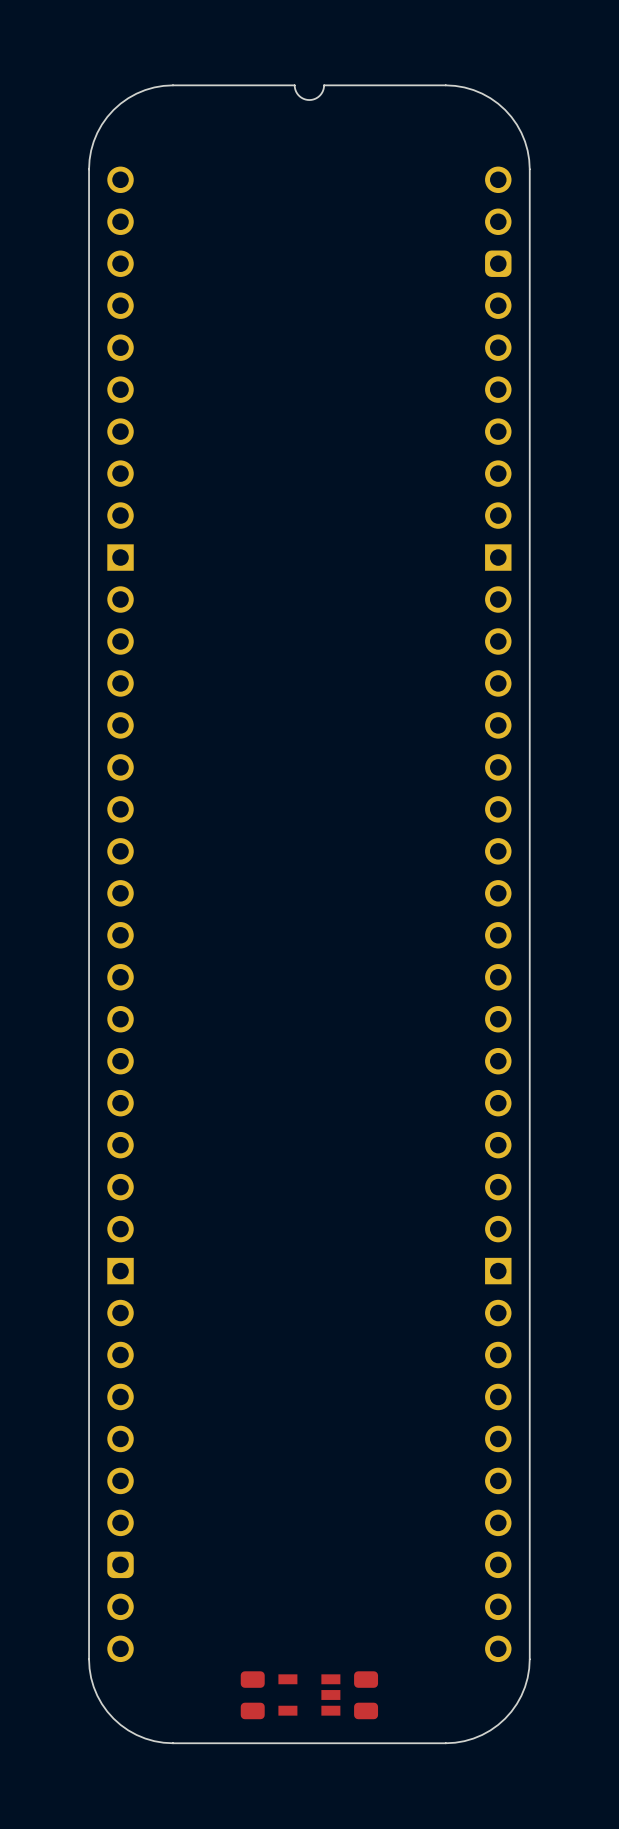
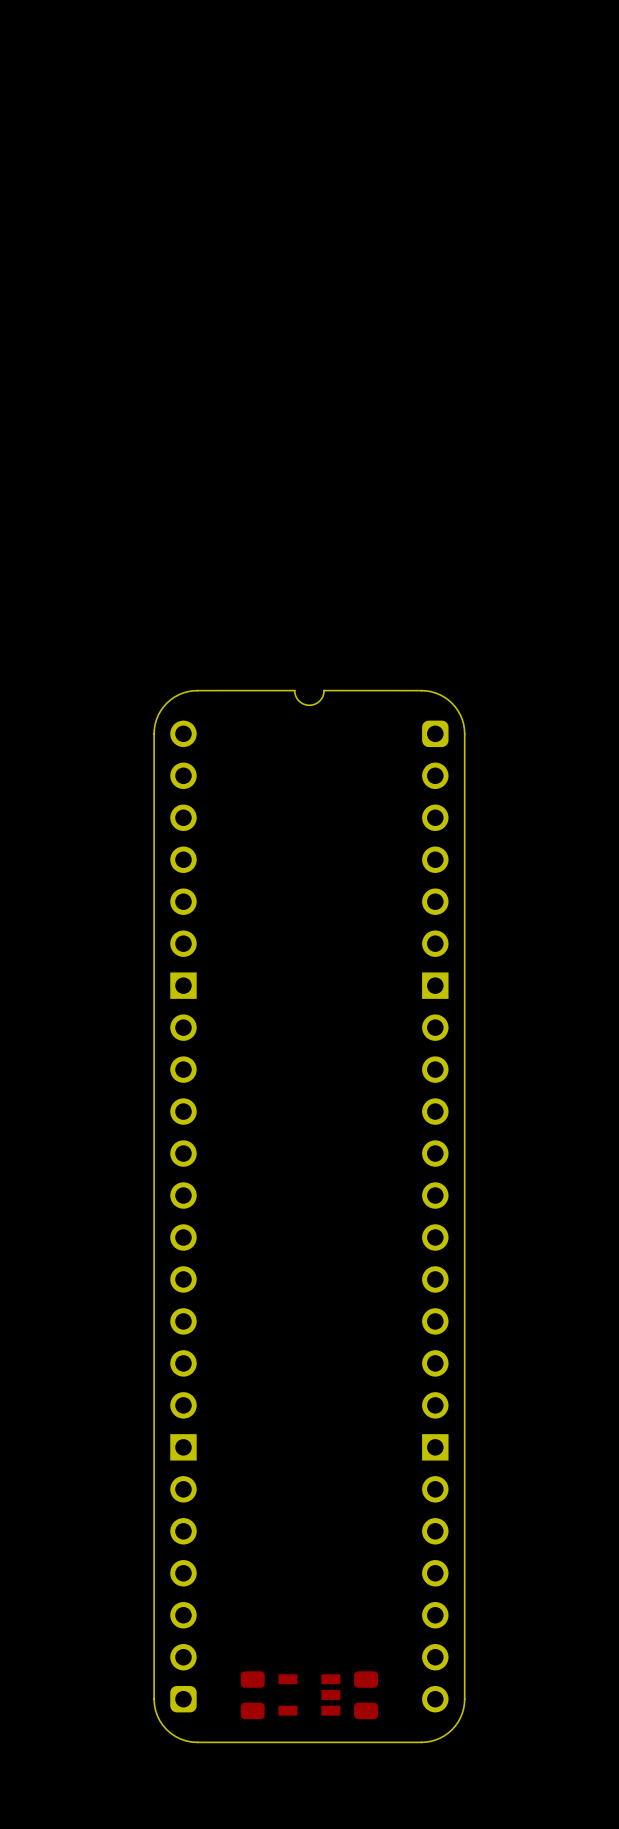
part: (309, 914) -> none
part: none -> (309, 1216)

